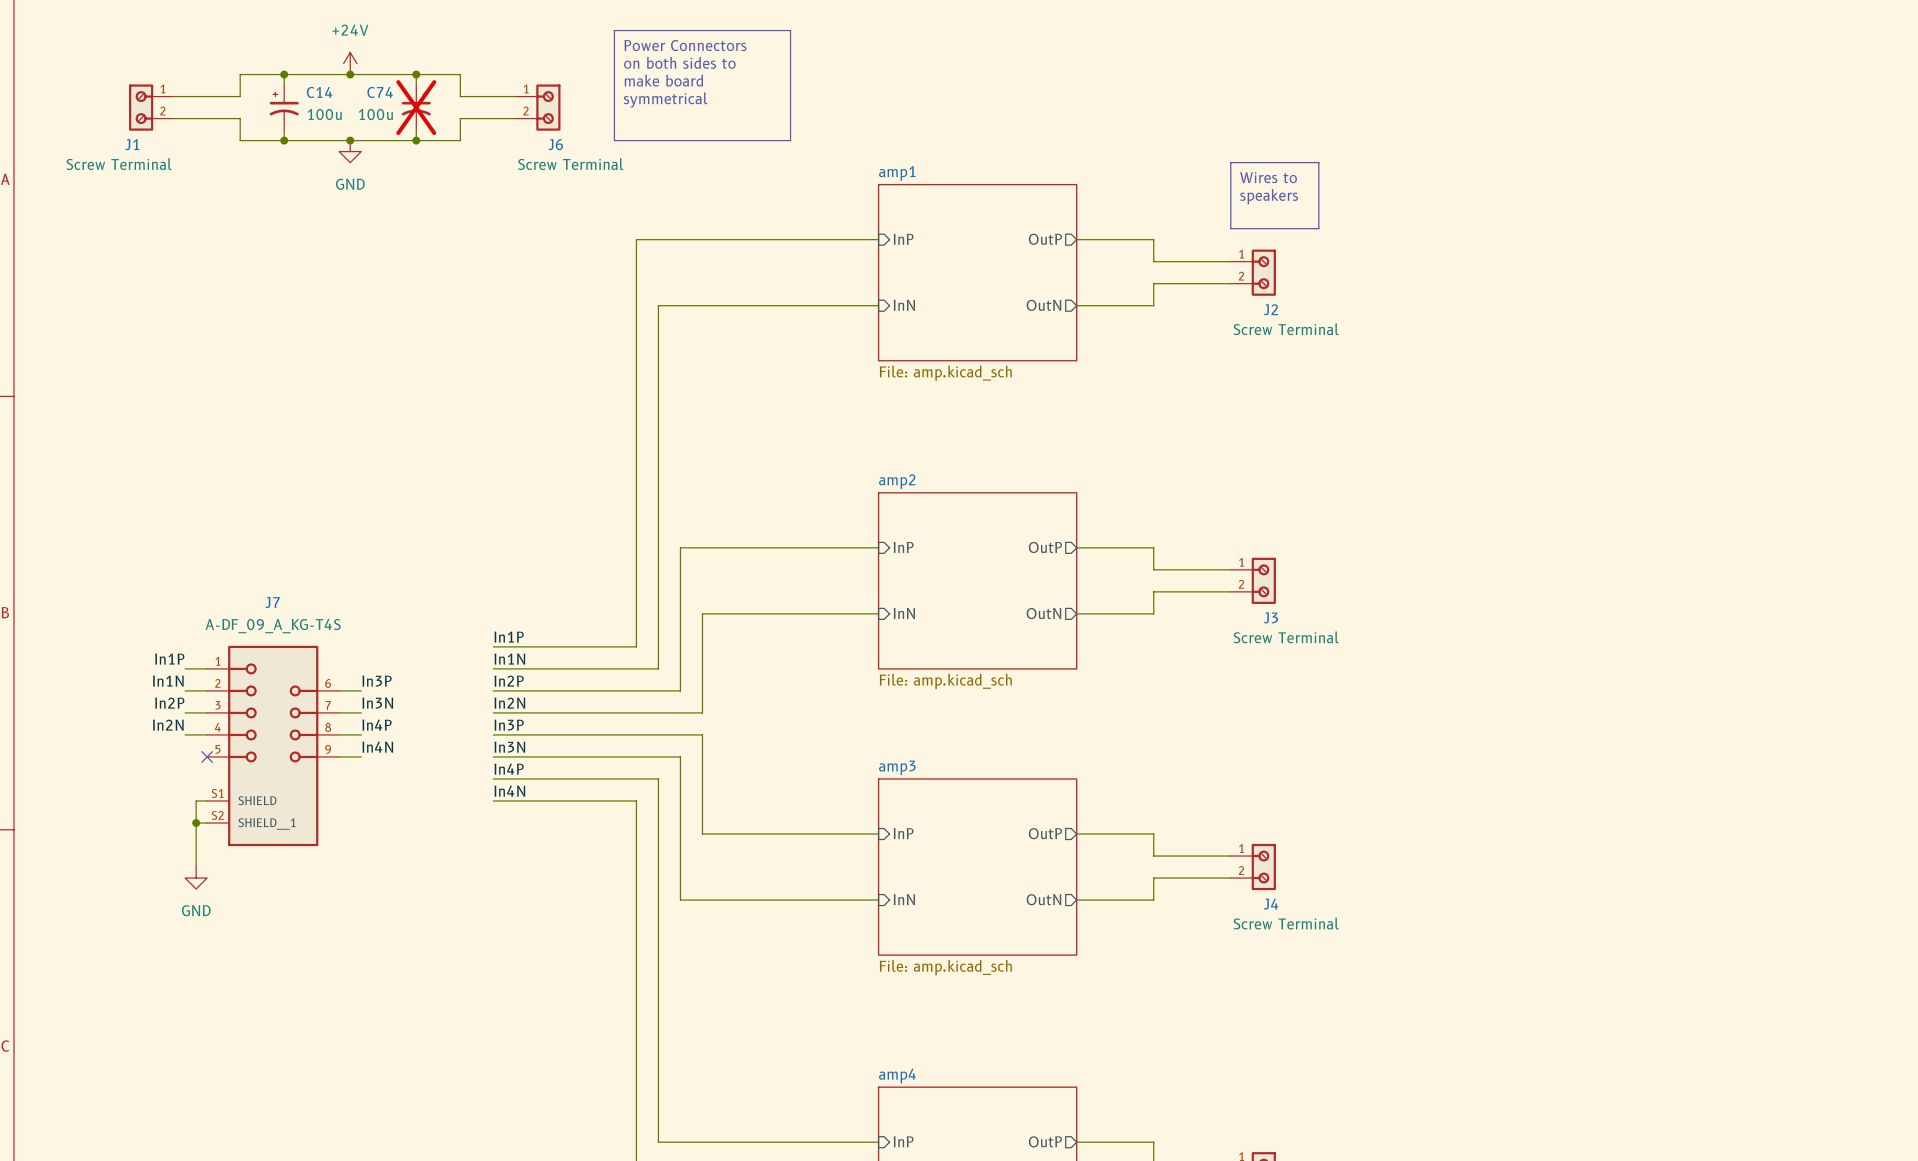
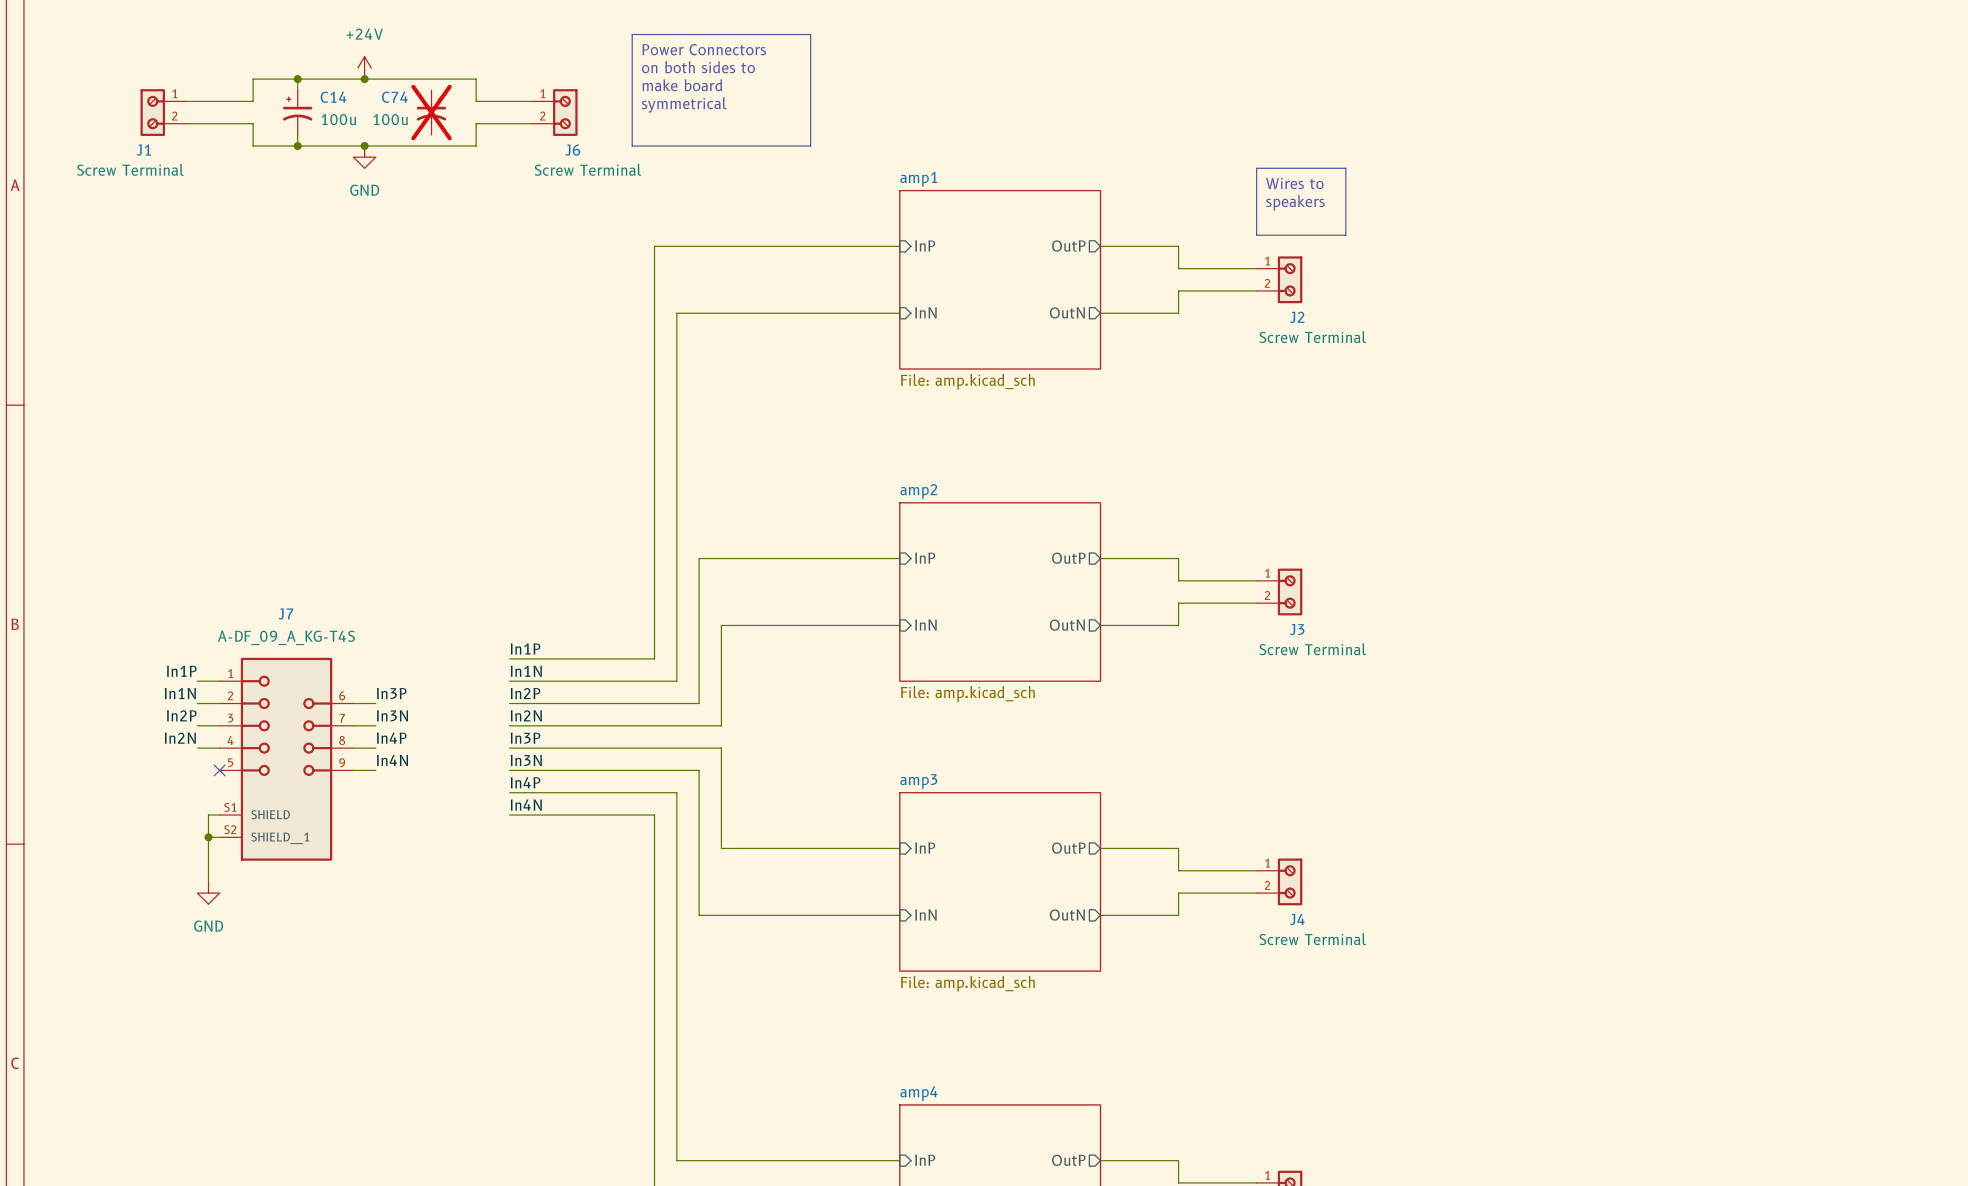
wire: (416, 74) (416, 85) -> none
junction: (416, 74) -> none
wire: (416, 129) (416, 140) -> none
junction: (416, 140) -> none

